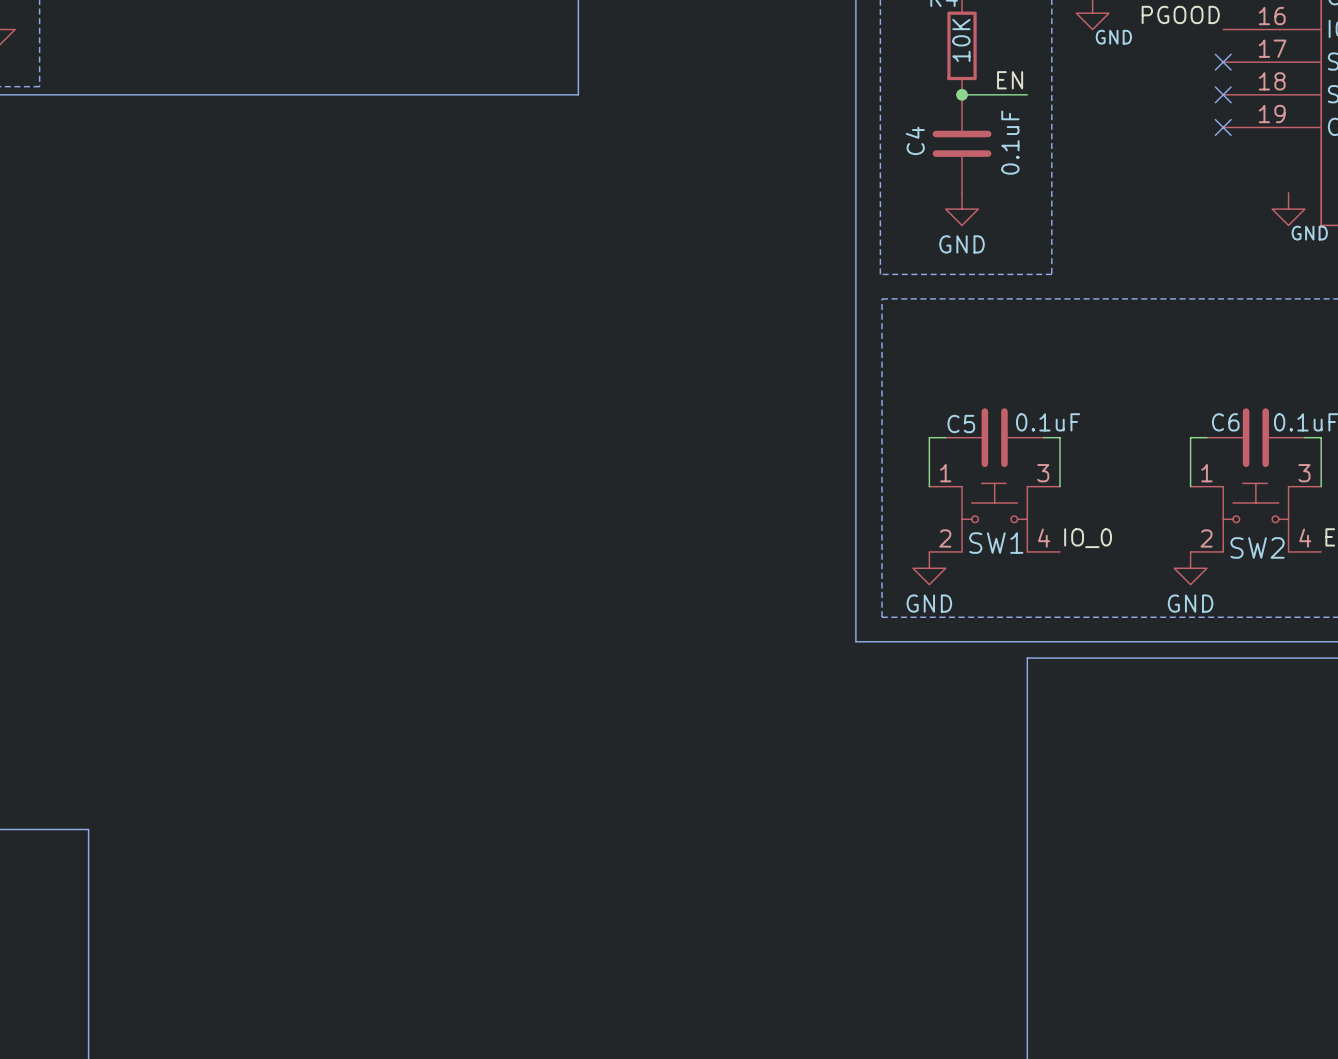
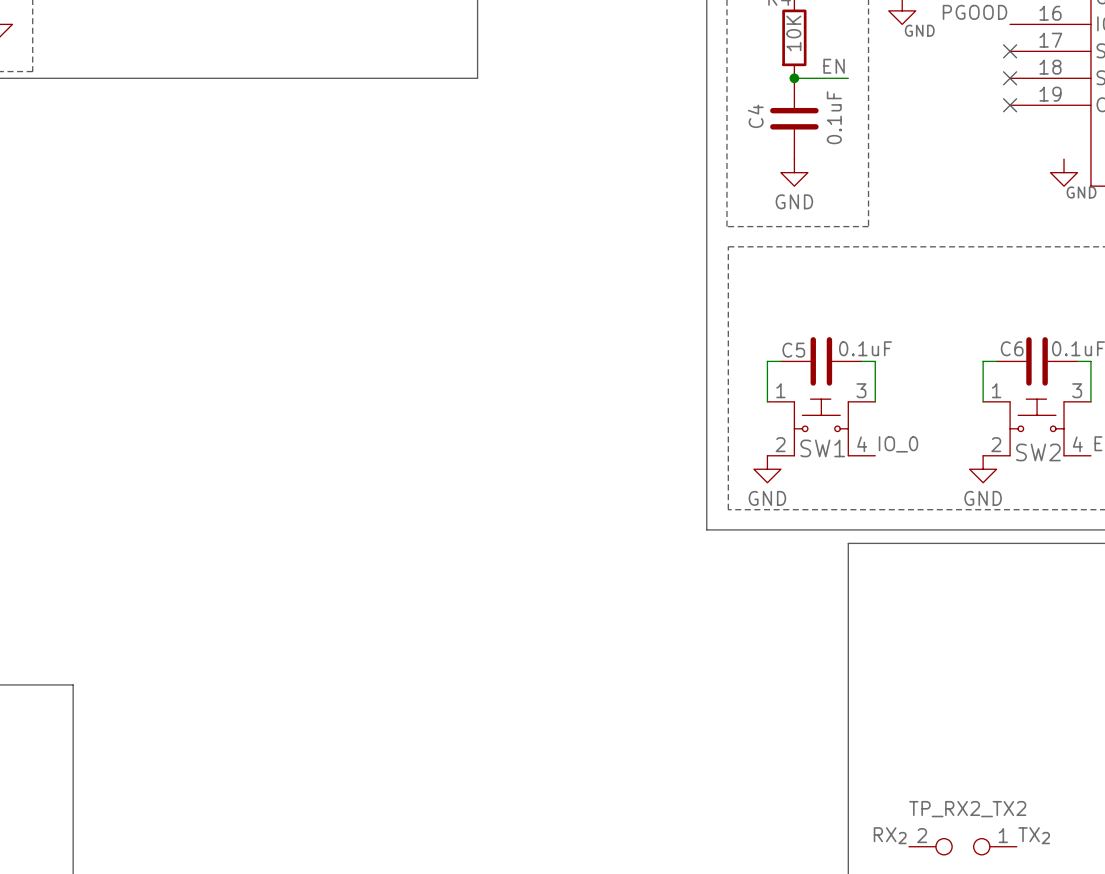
label: none -> RX2 (890, 835)
label: none -> TX2 (1034, 835)
TP_RX2_TX2: none -> (962, 846)

